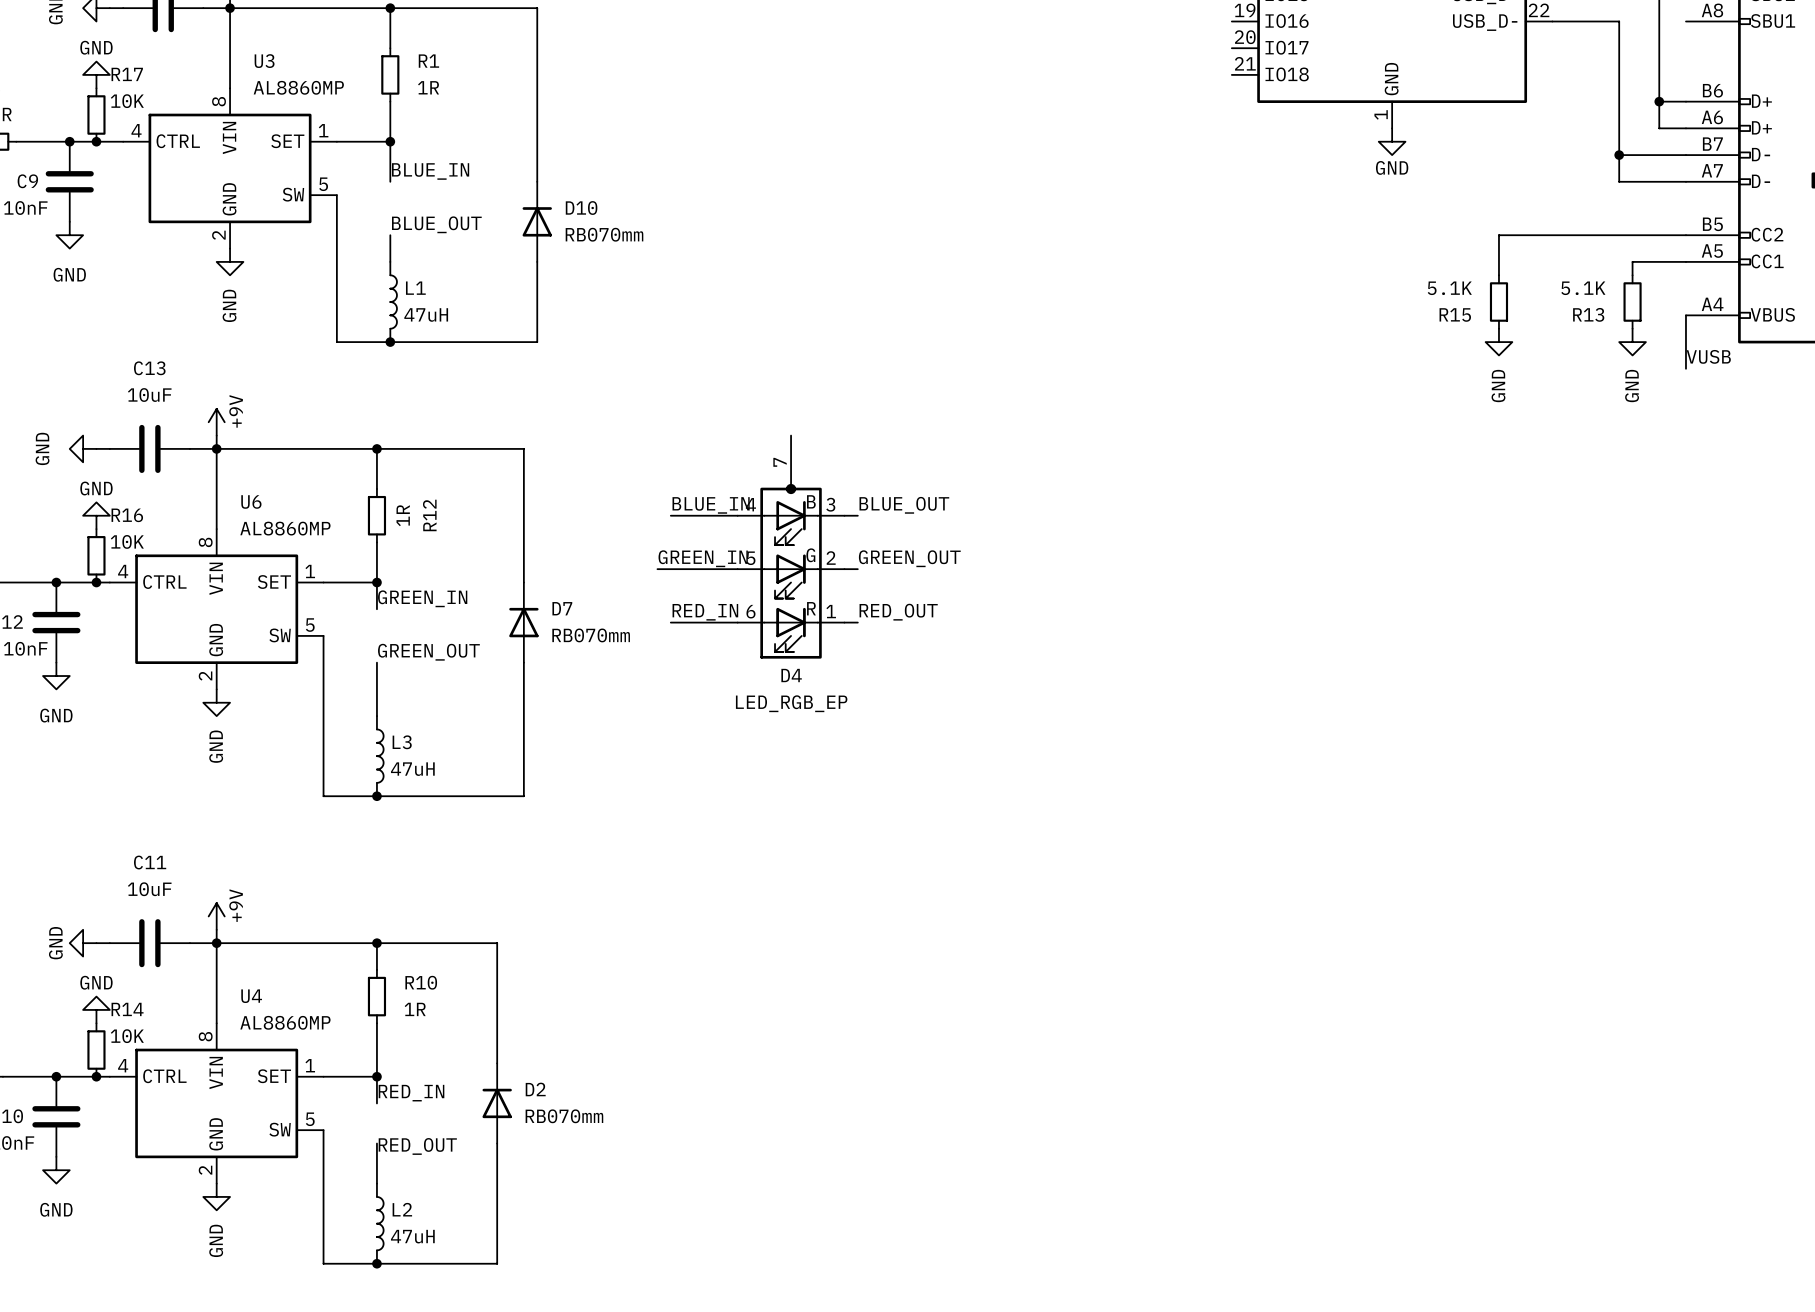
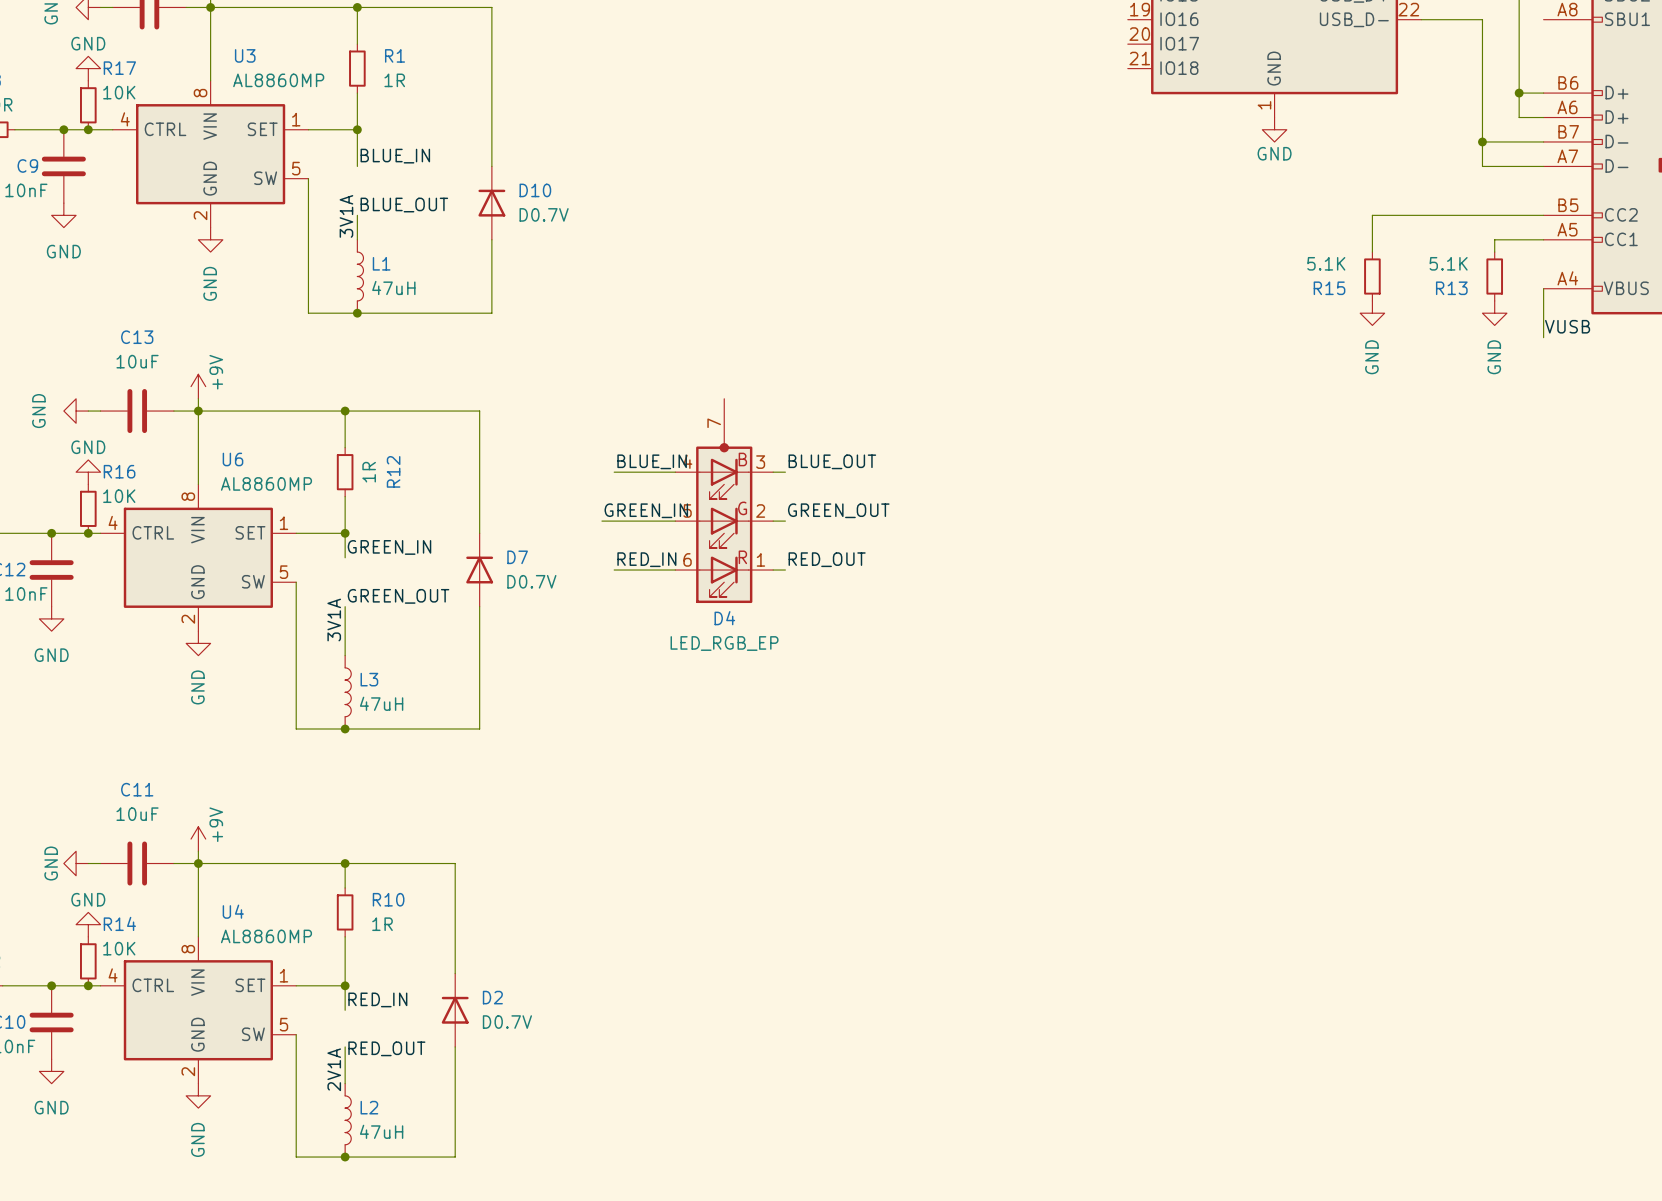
D10 value: RB070mm (604, 234) -> D0.7V (544, 214)
label: none -> 3V1A (346, 216)
D7 value: RB070mm (591, 635) -> D0.7V (531, 581)
label: none -> 3V1A (334, 620)
D2 value: RB070mm (564, 1116) -> D0.7V (507, 1022)
label: none -> 2V1A (334, 1069)

